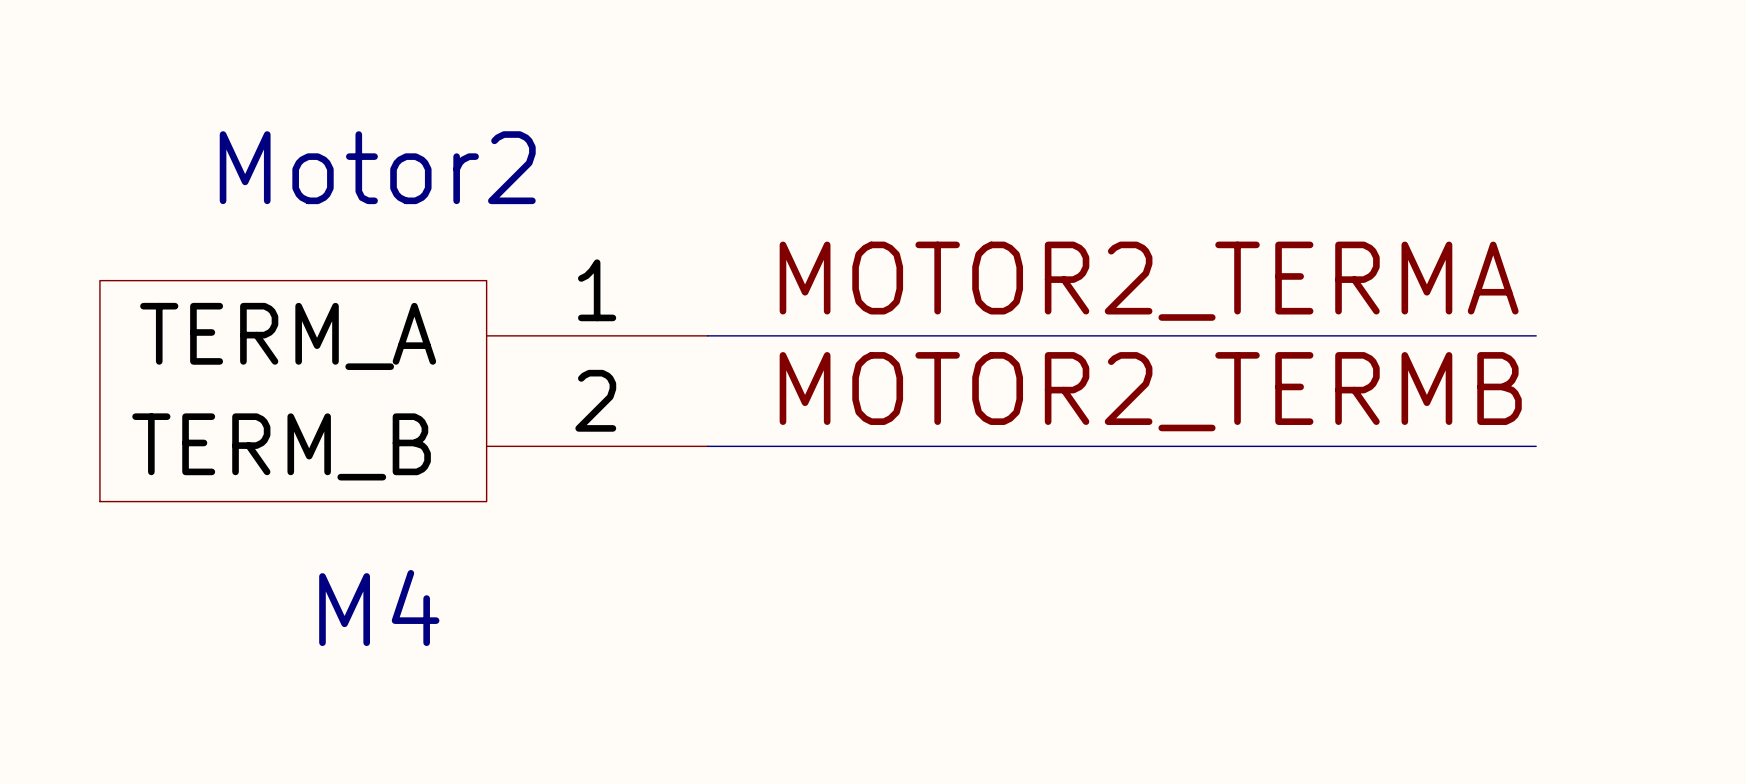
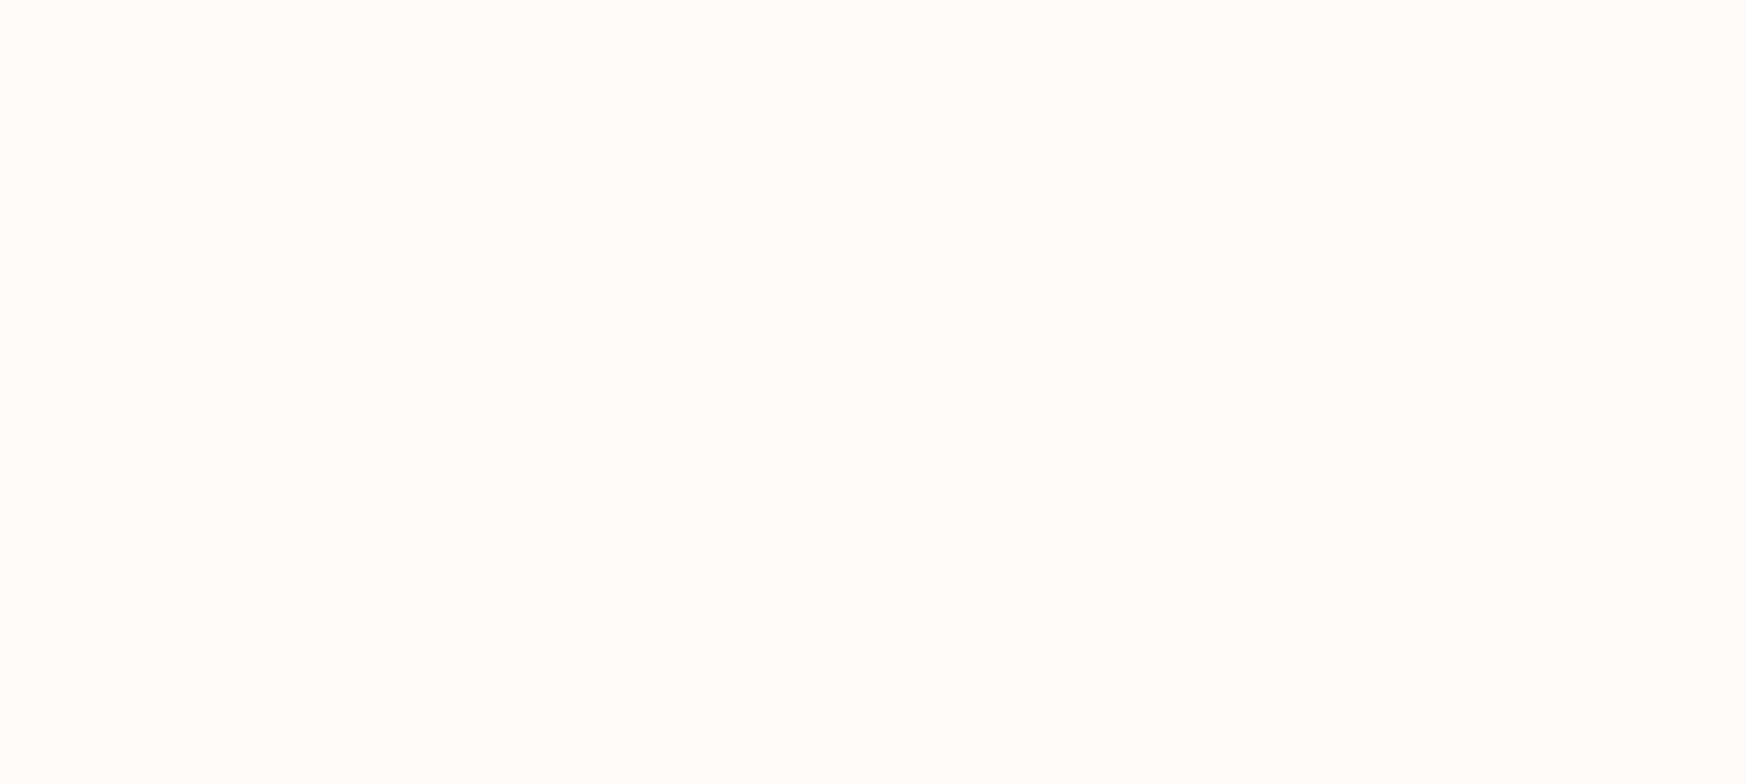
label: MOTOR2_TERMA (1149, 281) -> none
wire: (707, 335) (1536, 335) -> none
M4: Motor2 (403, 391) -> none
label: MOTOR2_TERMB (1150, 391) -> none
wire: (707, 446) (1536, 446) -> none

